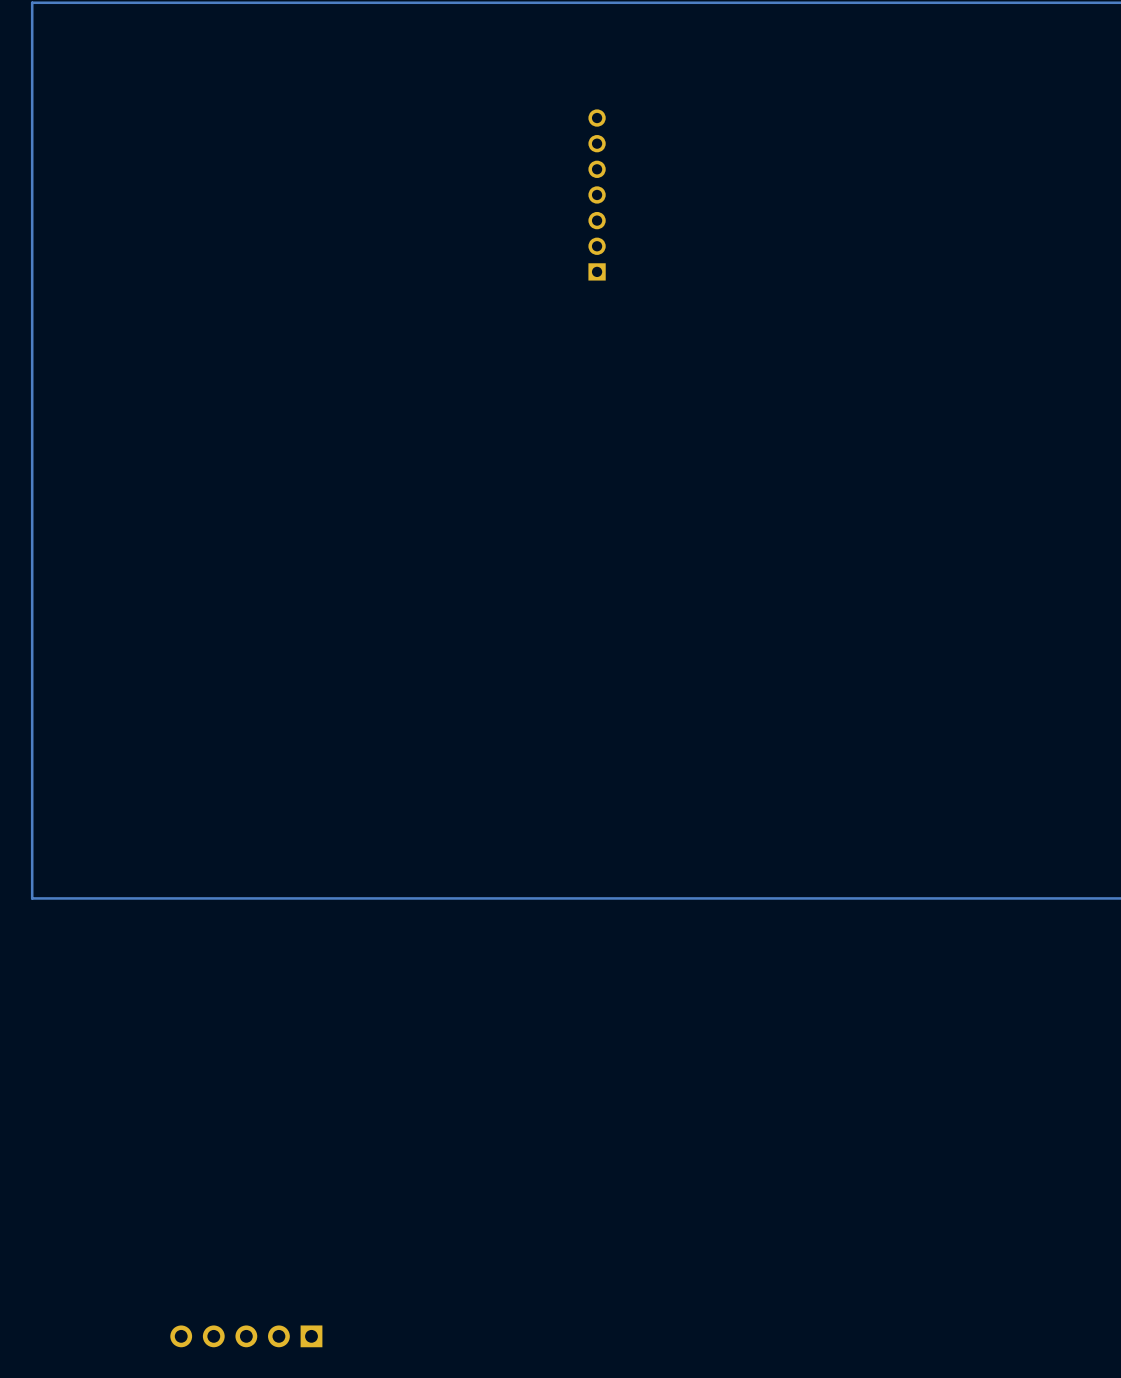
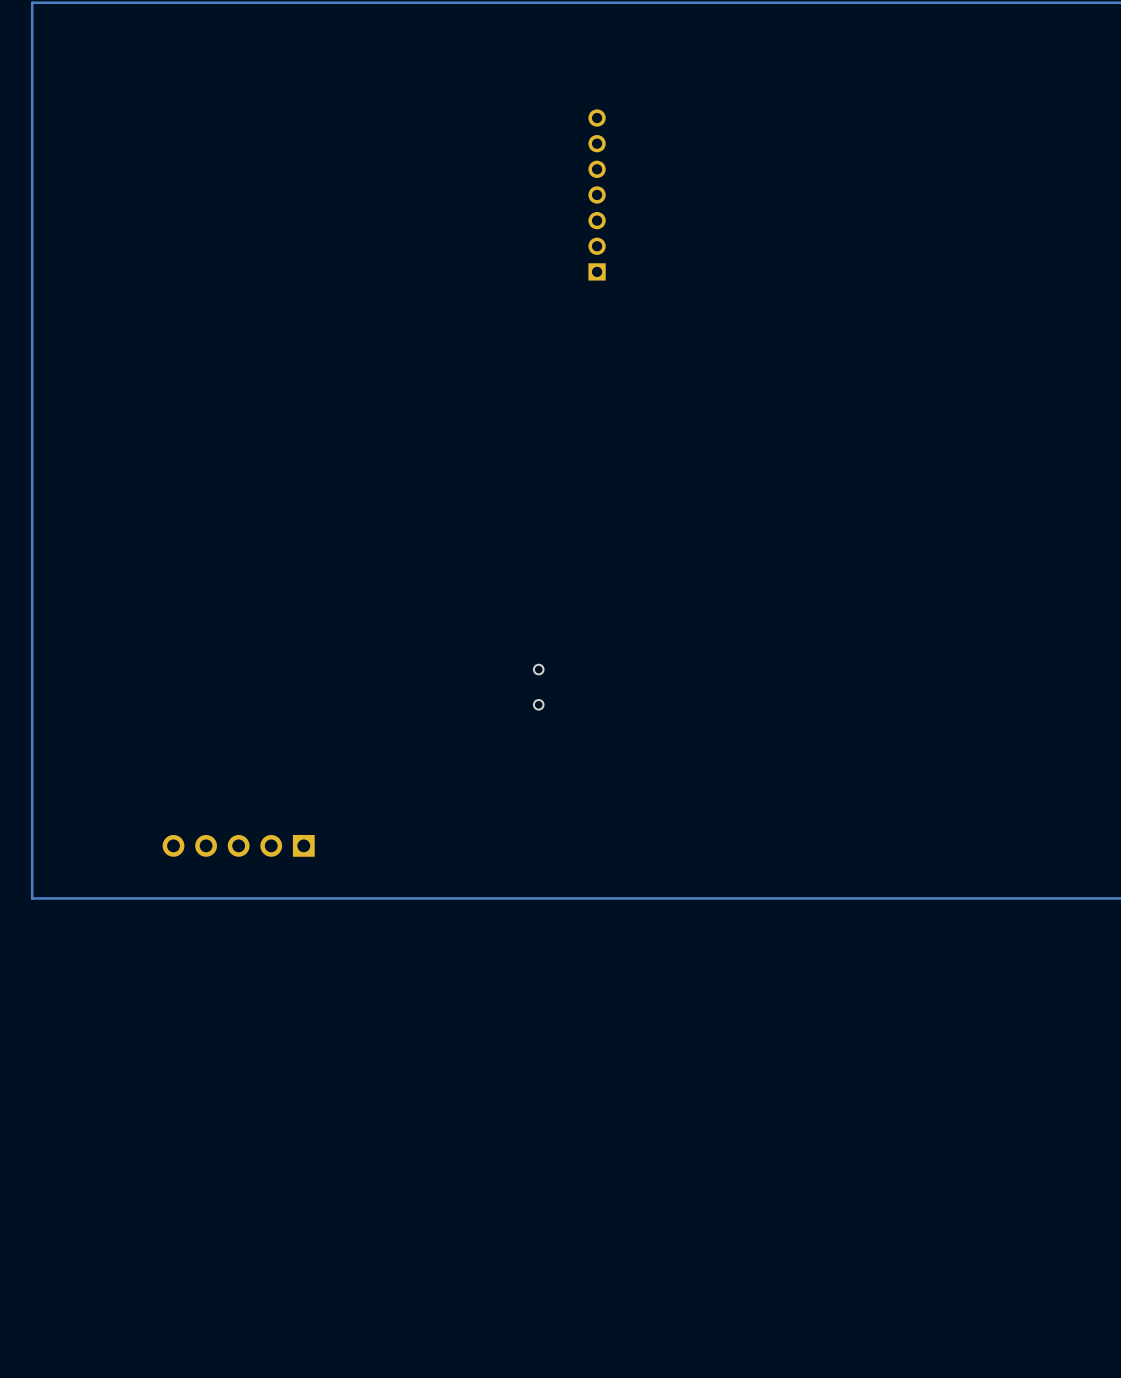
part: none -> (538, 687)
part: none -> (238, 845)
part: (246, 1336) -> none

